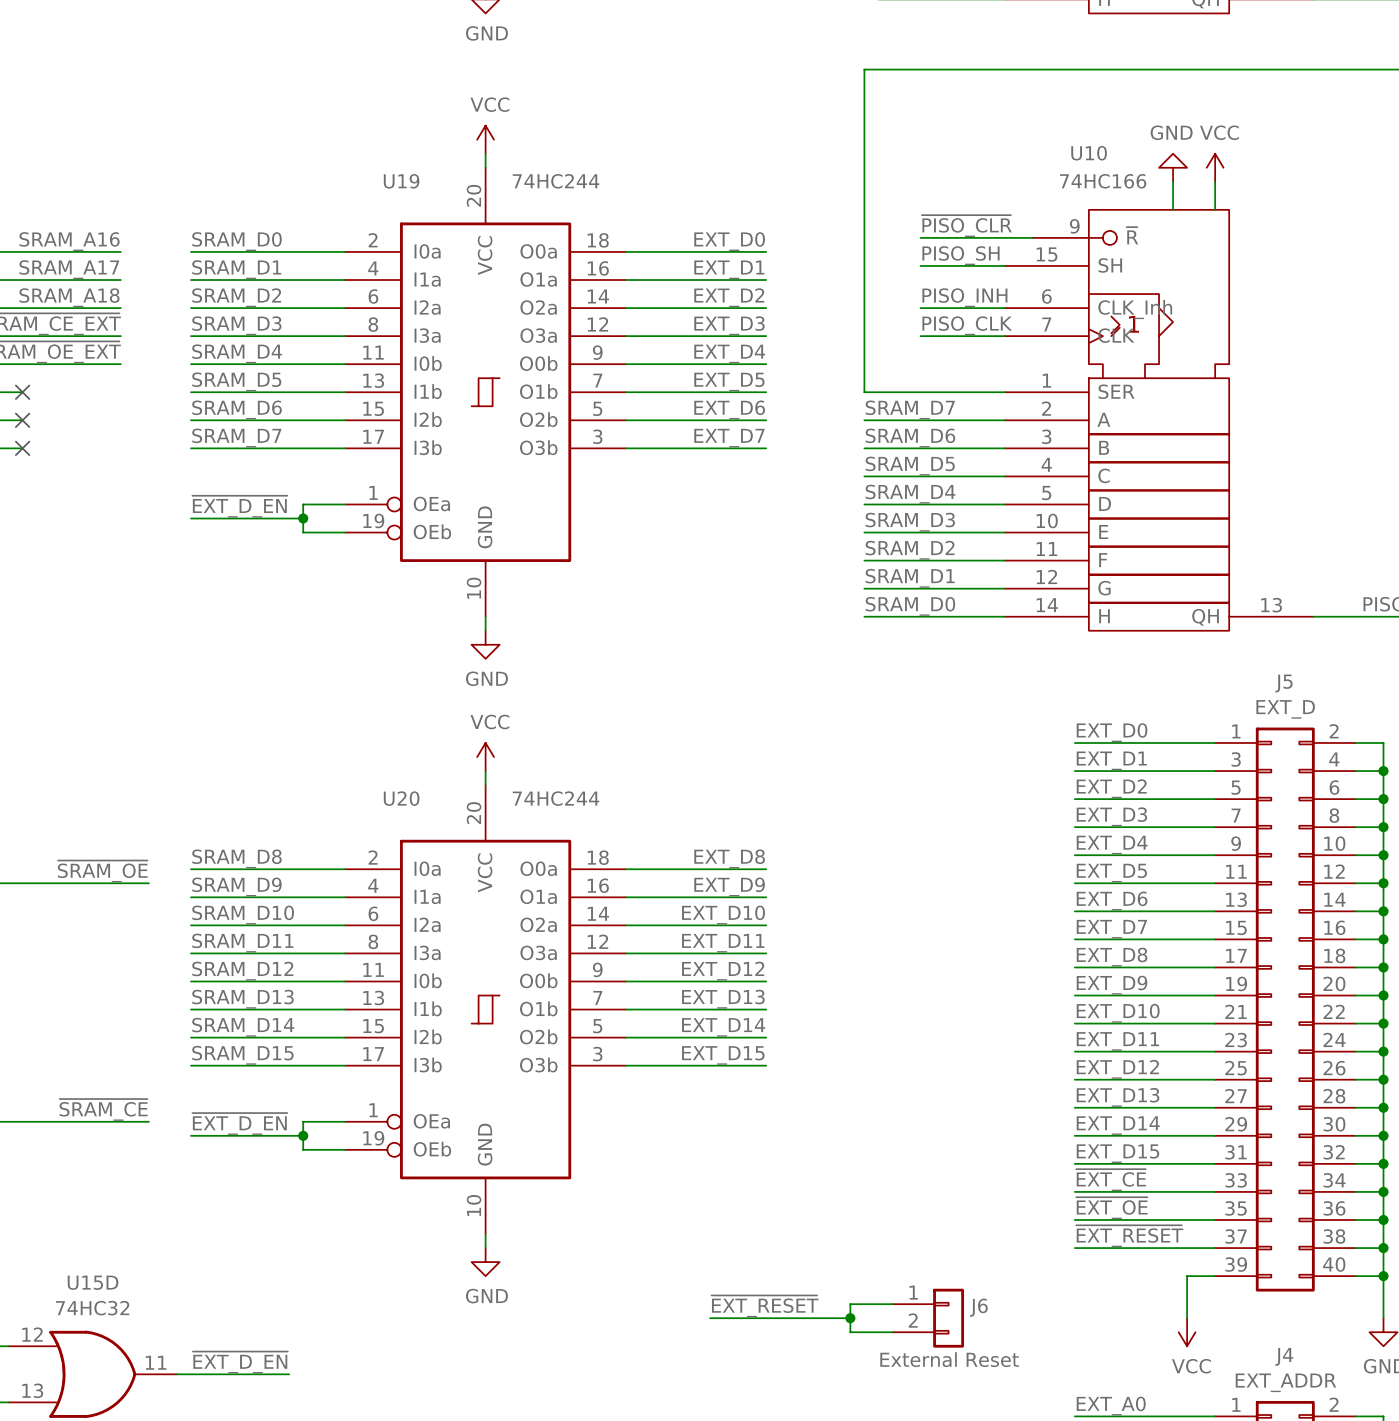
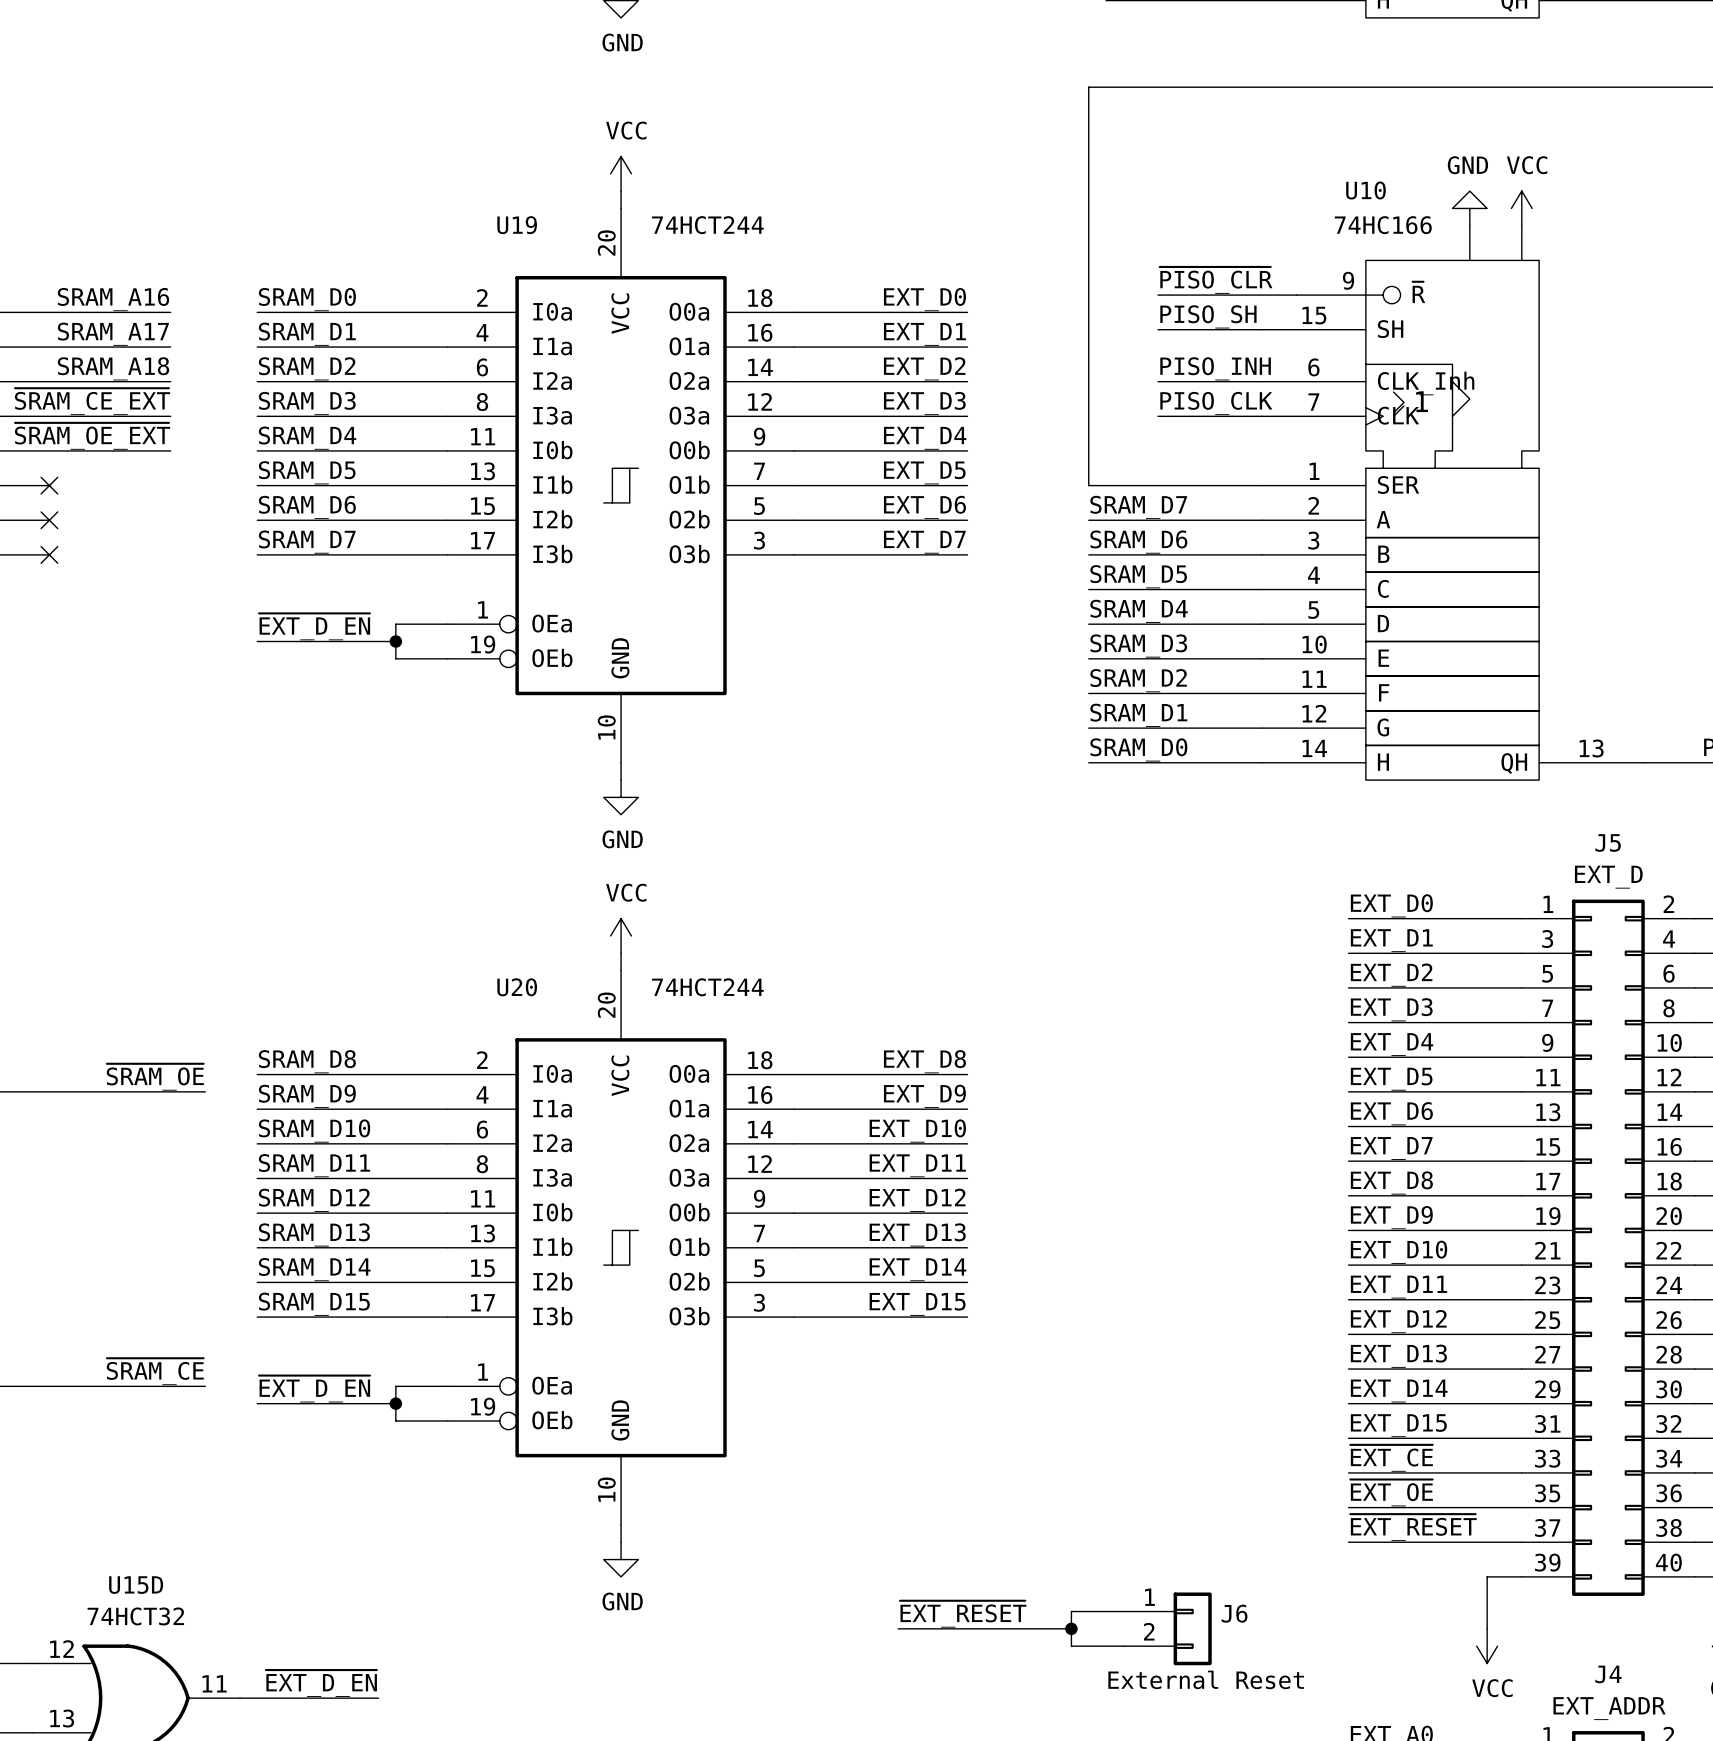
U19 value: 74HC244 (556, 181) -> 74HCT244 (707, 225)
U20 value: 74HC244 (556, 798) -> 74HCT244 (707, 987)
U15D value: 74HC32 (92, 1308) -> 74HCT32 (135, 1616)

